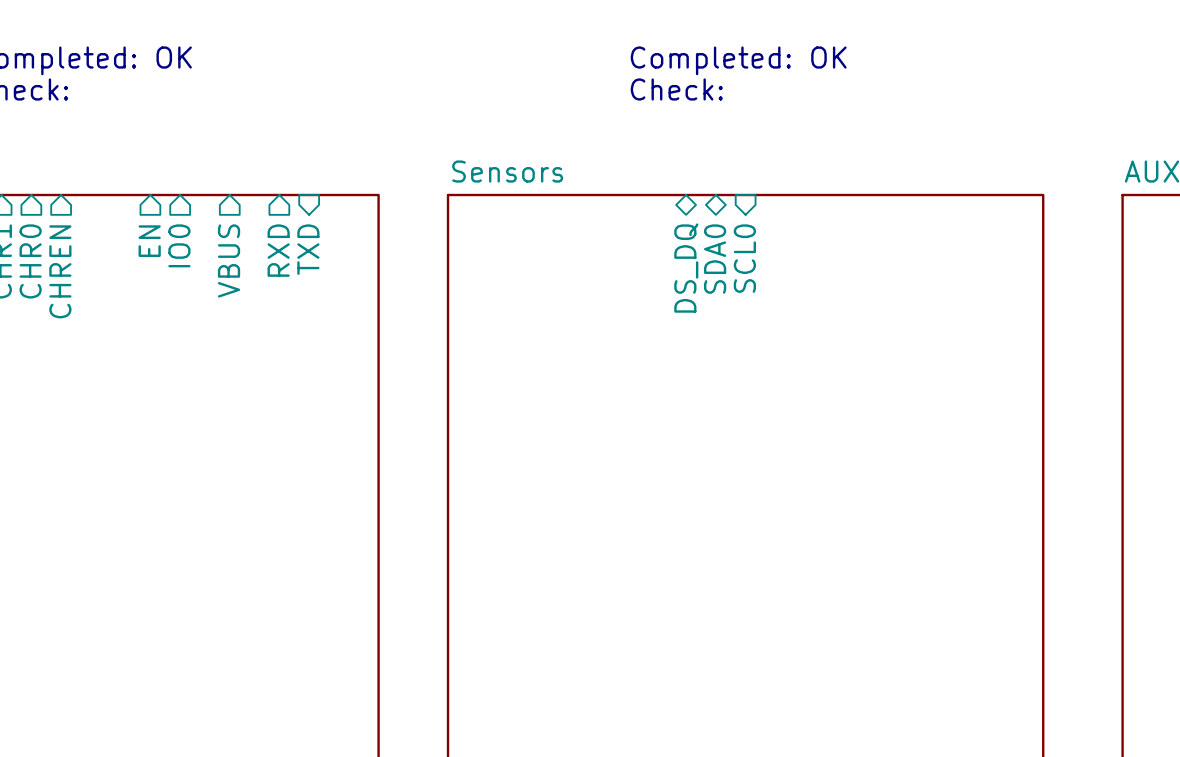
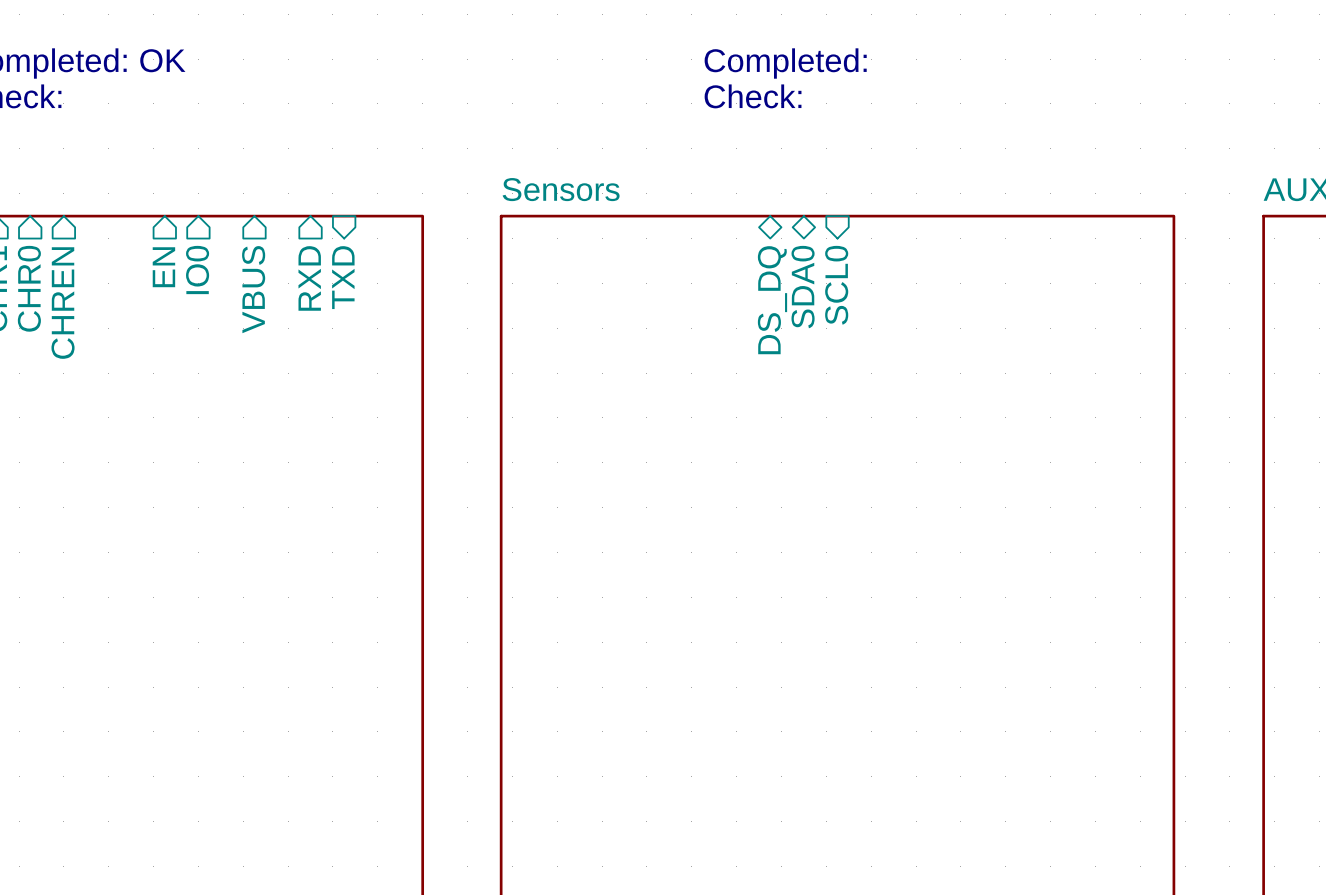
text: Completed: OK (738, 60) -> Completed: (785, 63)

